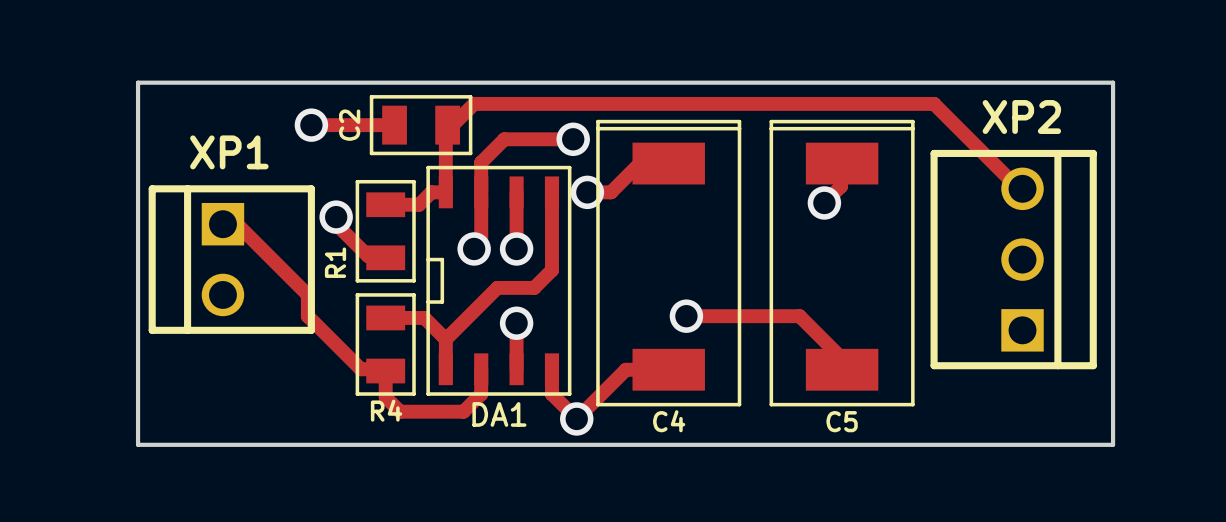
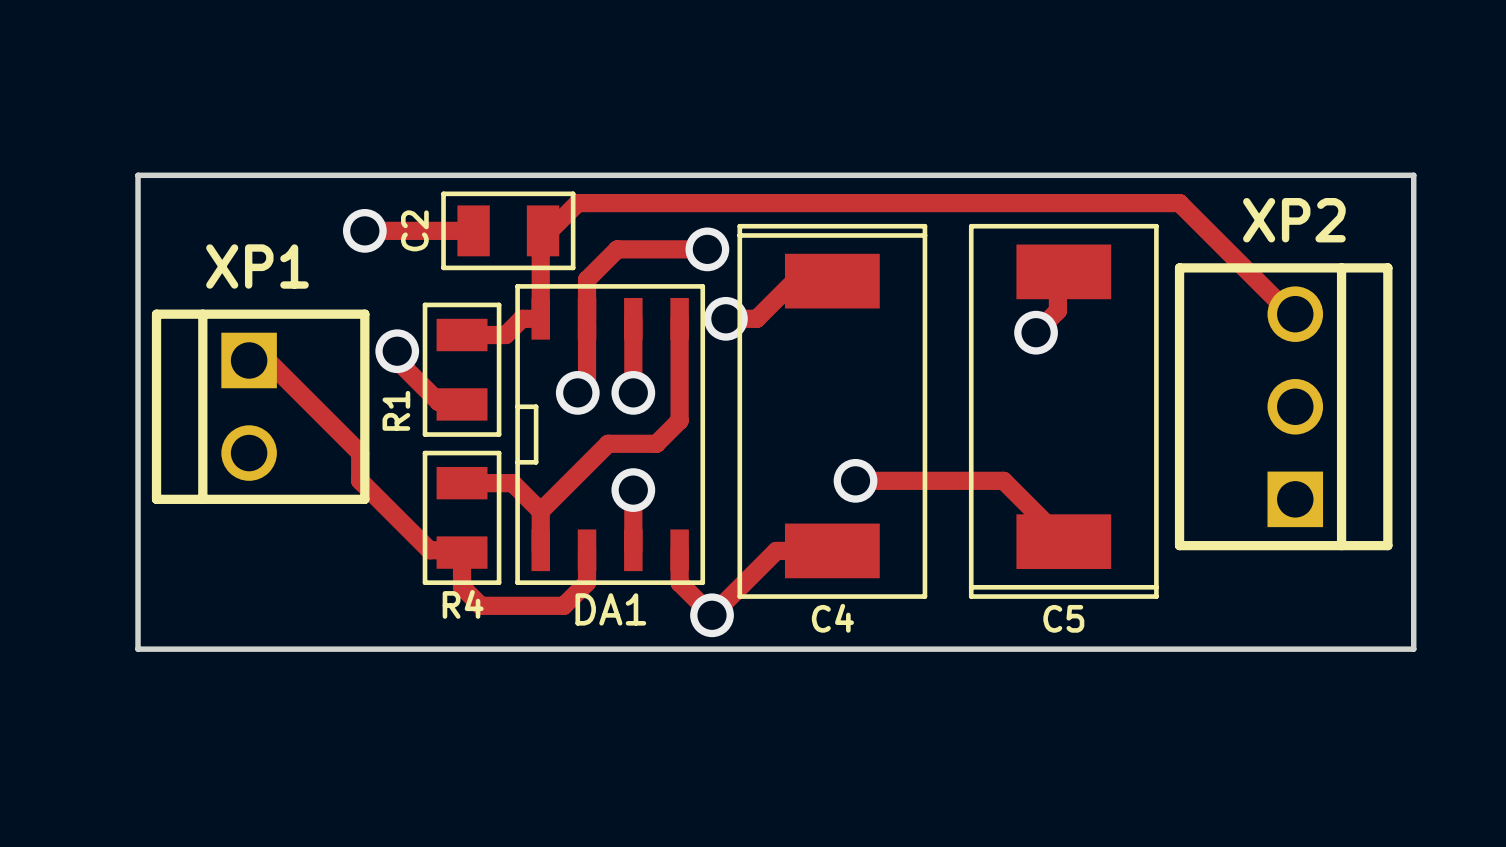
C5 rotation: 0° (842, 263) -> 180° (1063, 411)

